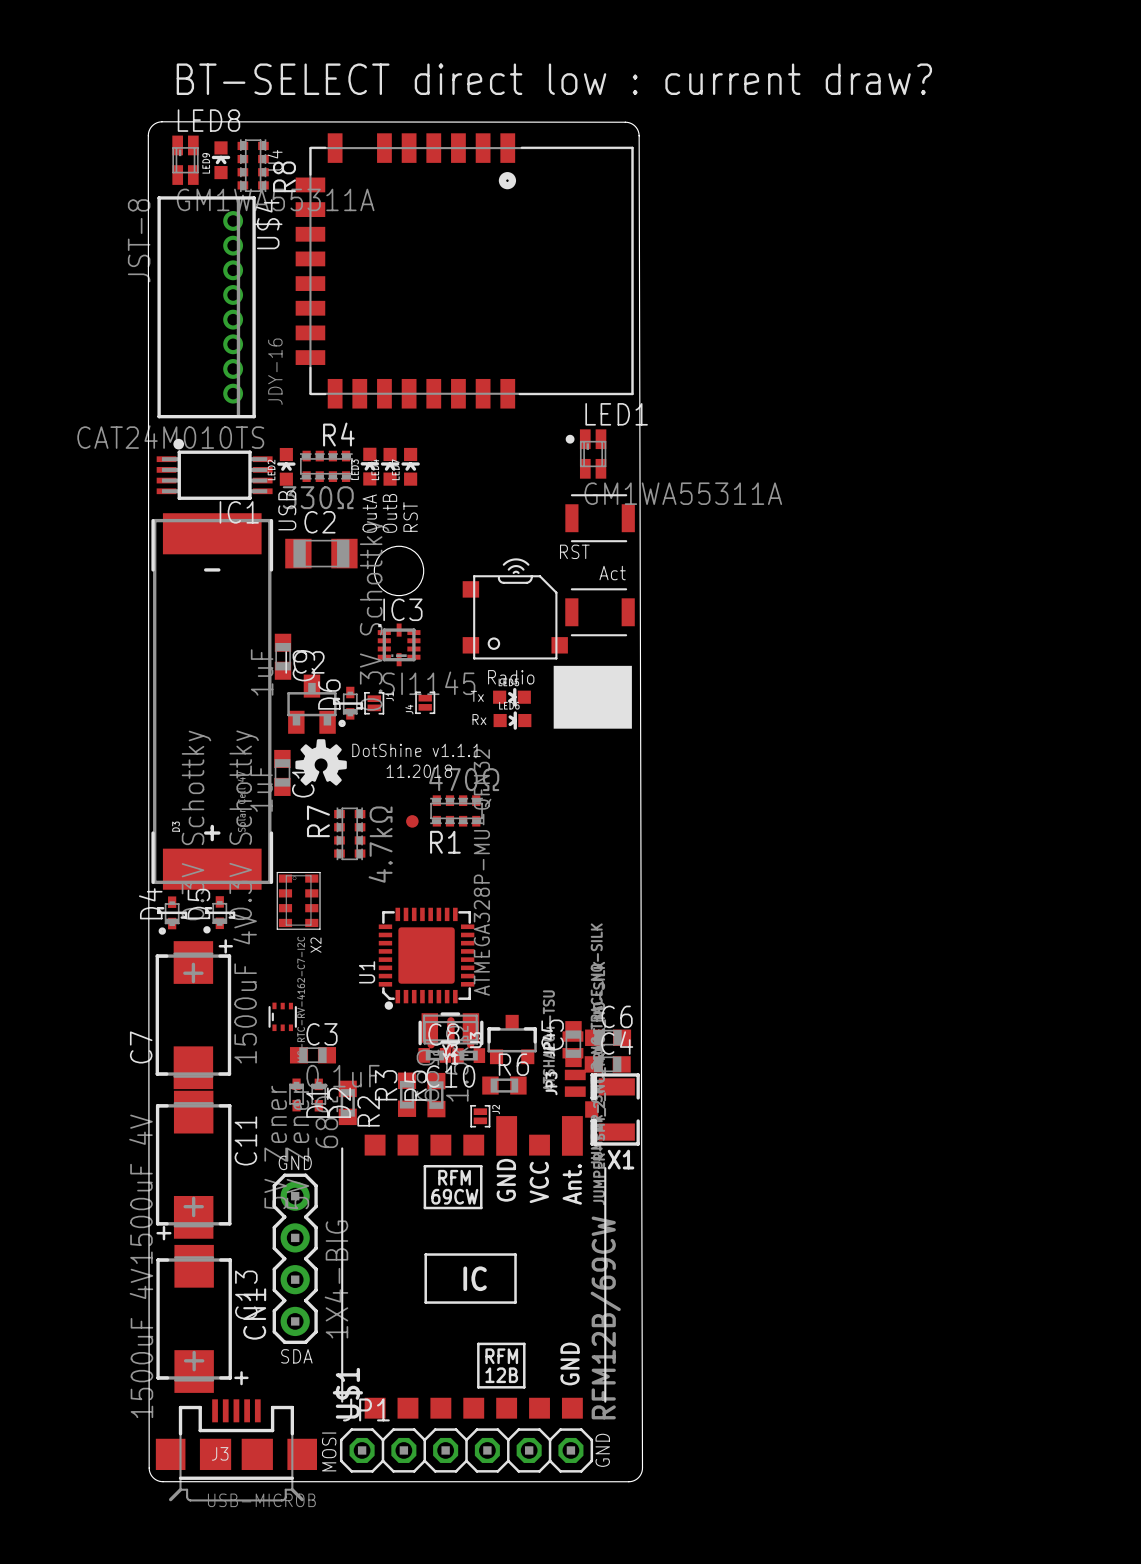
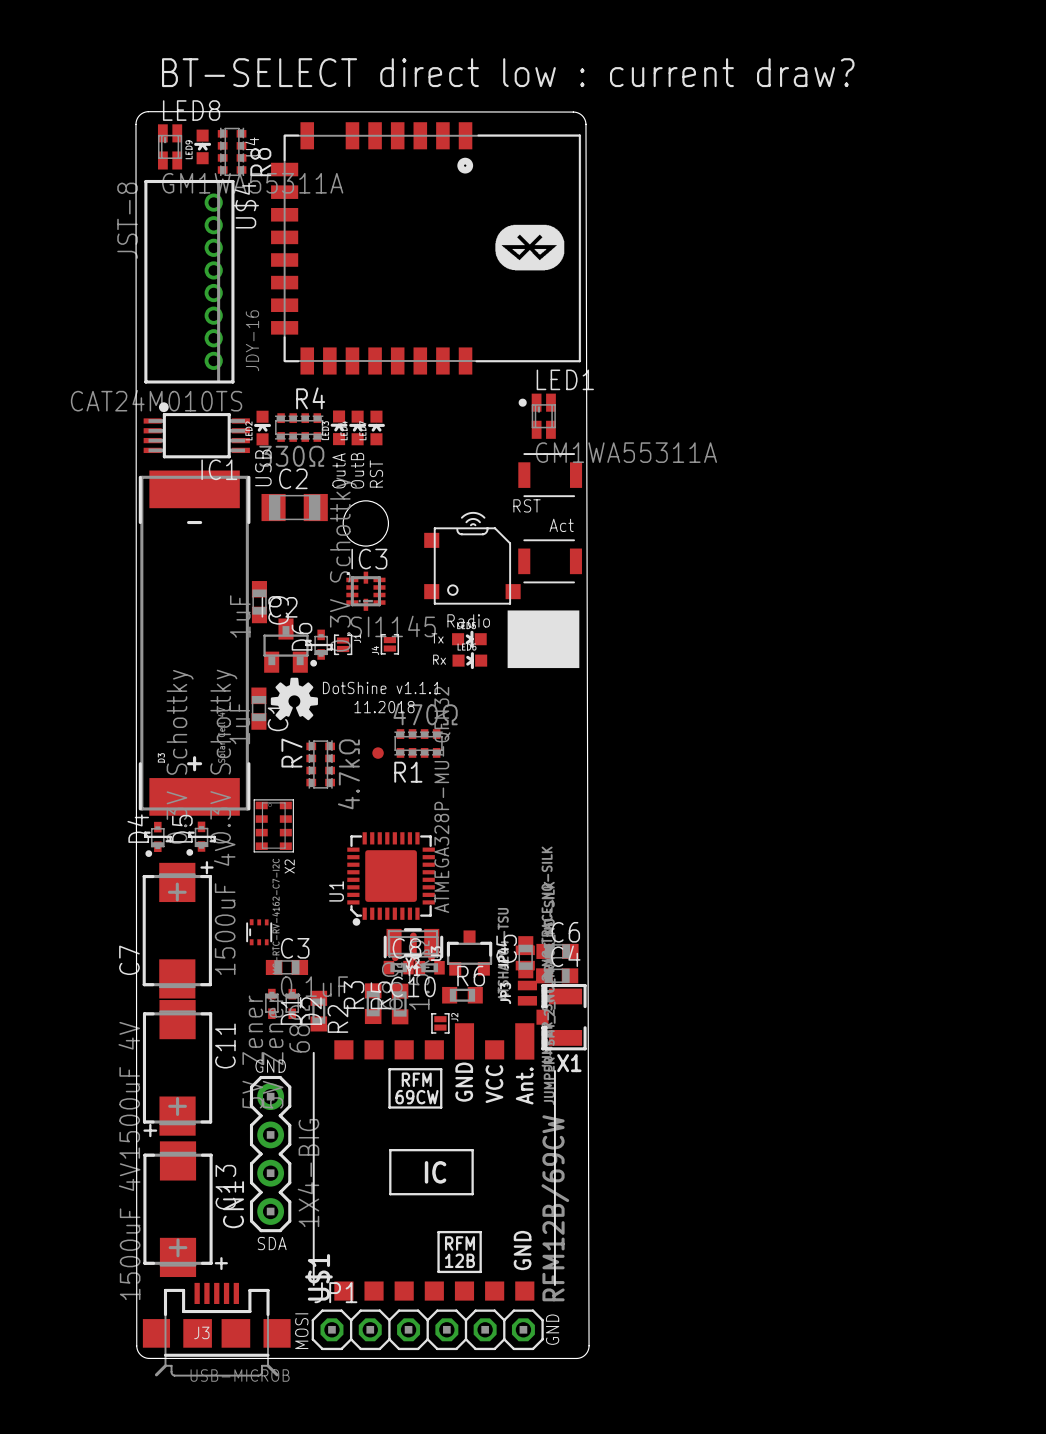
drawing: none -> [495, 224, 565, 271]

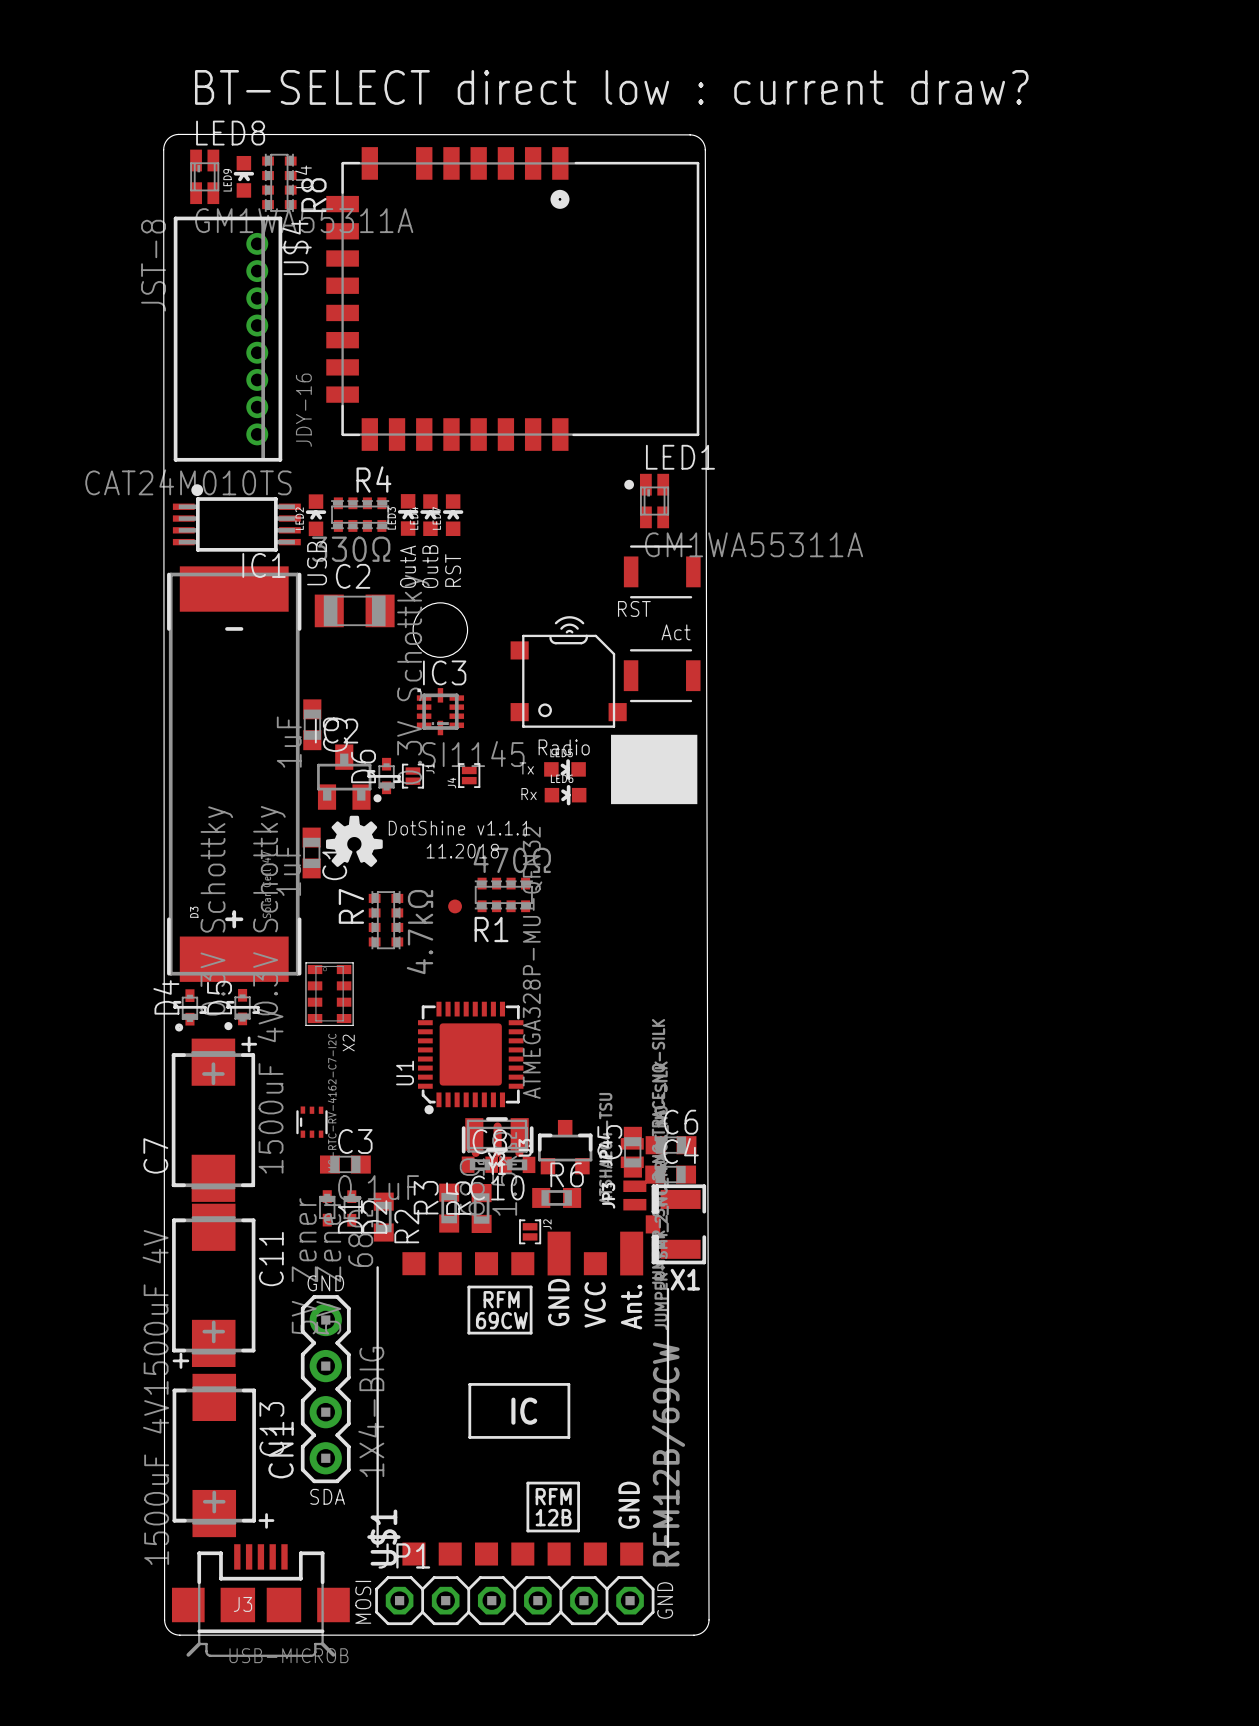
drawing: [495, 224, 565, 271] -> none

